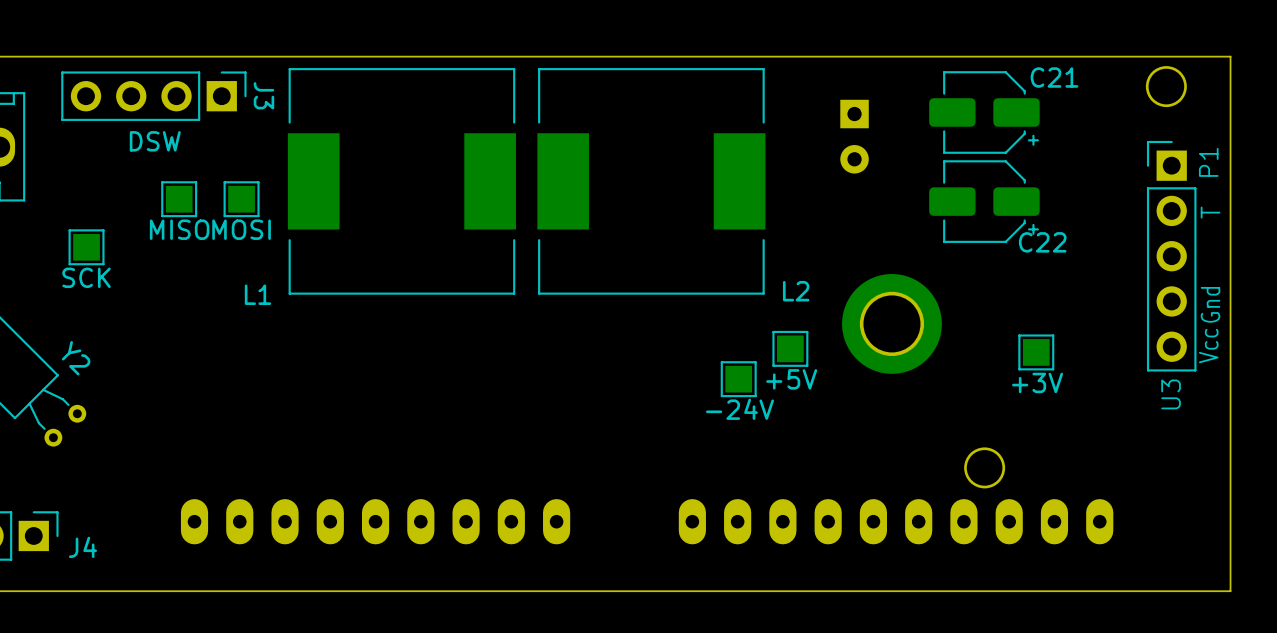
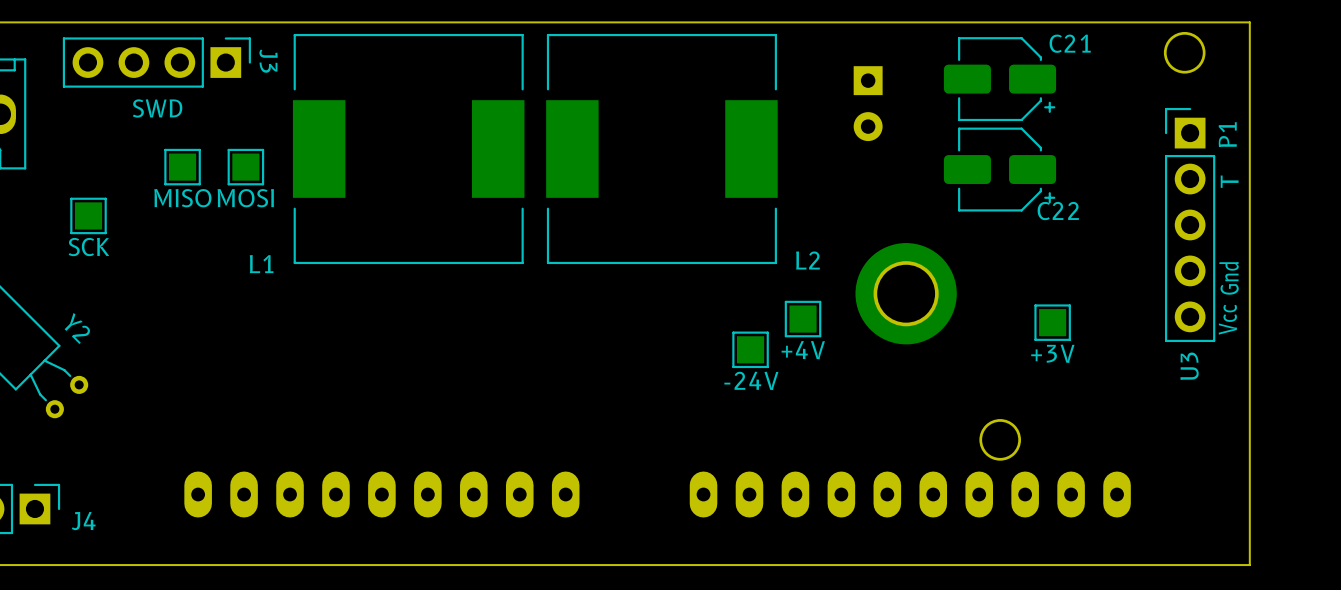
J3 value: DSW (155, 141) -> SWD (157, 108)
part value: +5V (791, 379) -> +4V (803, 350)

